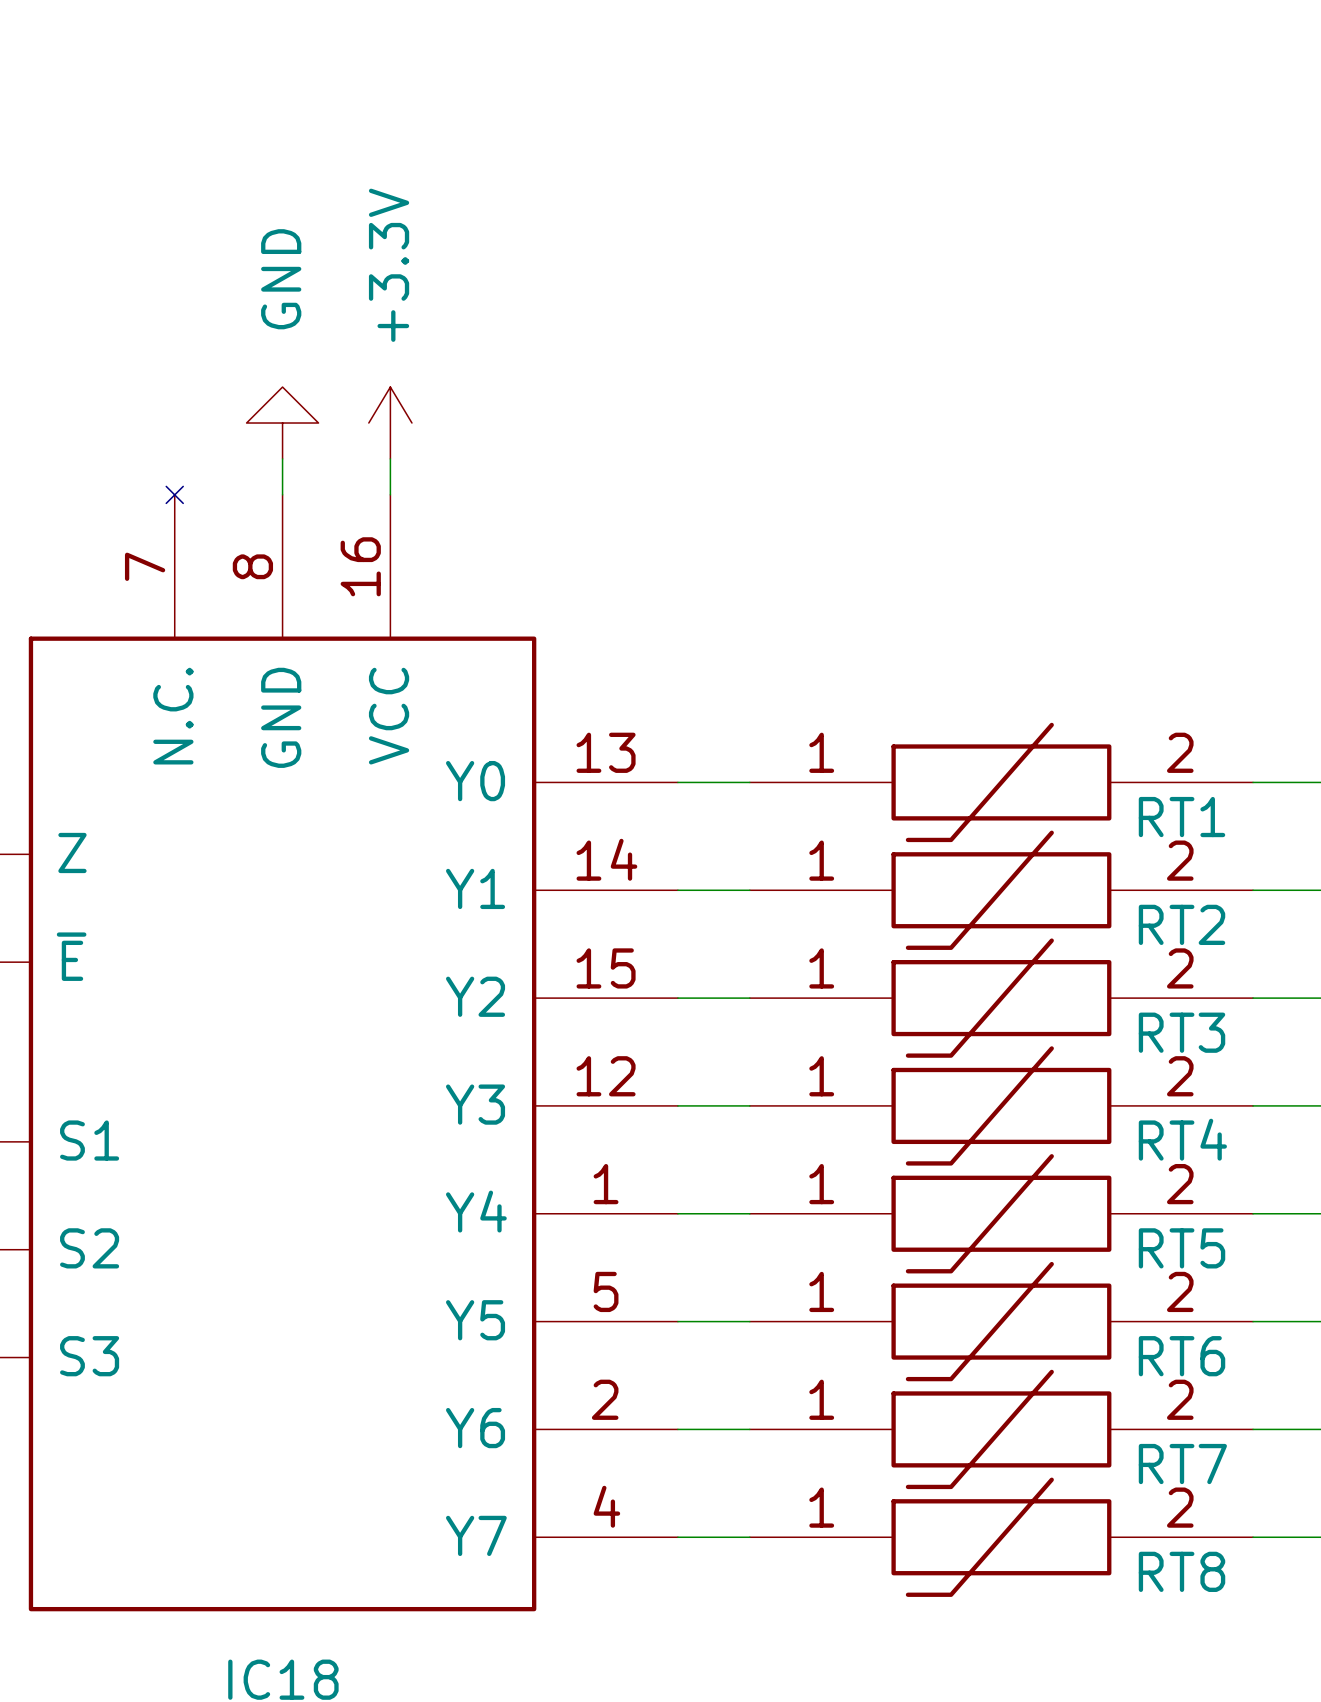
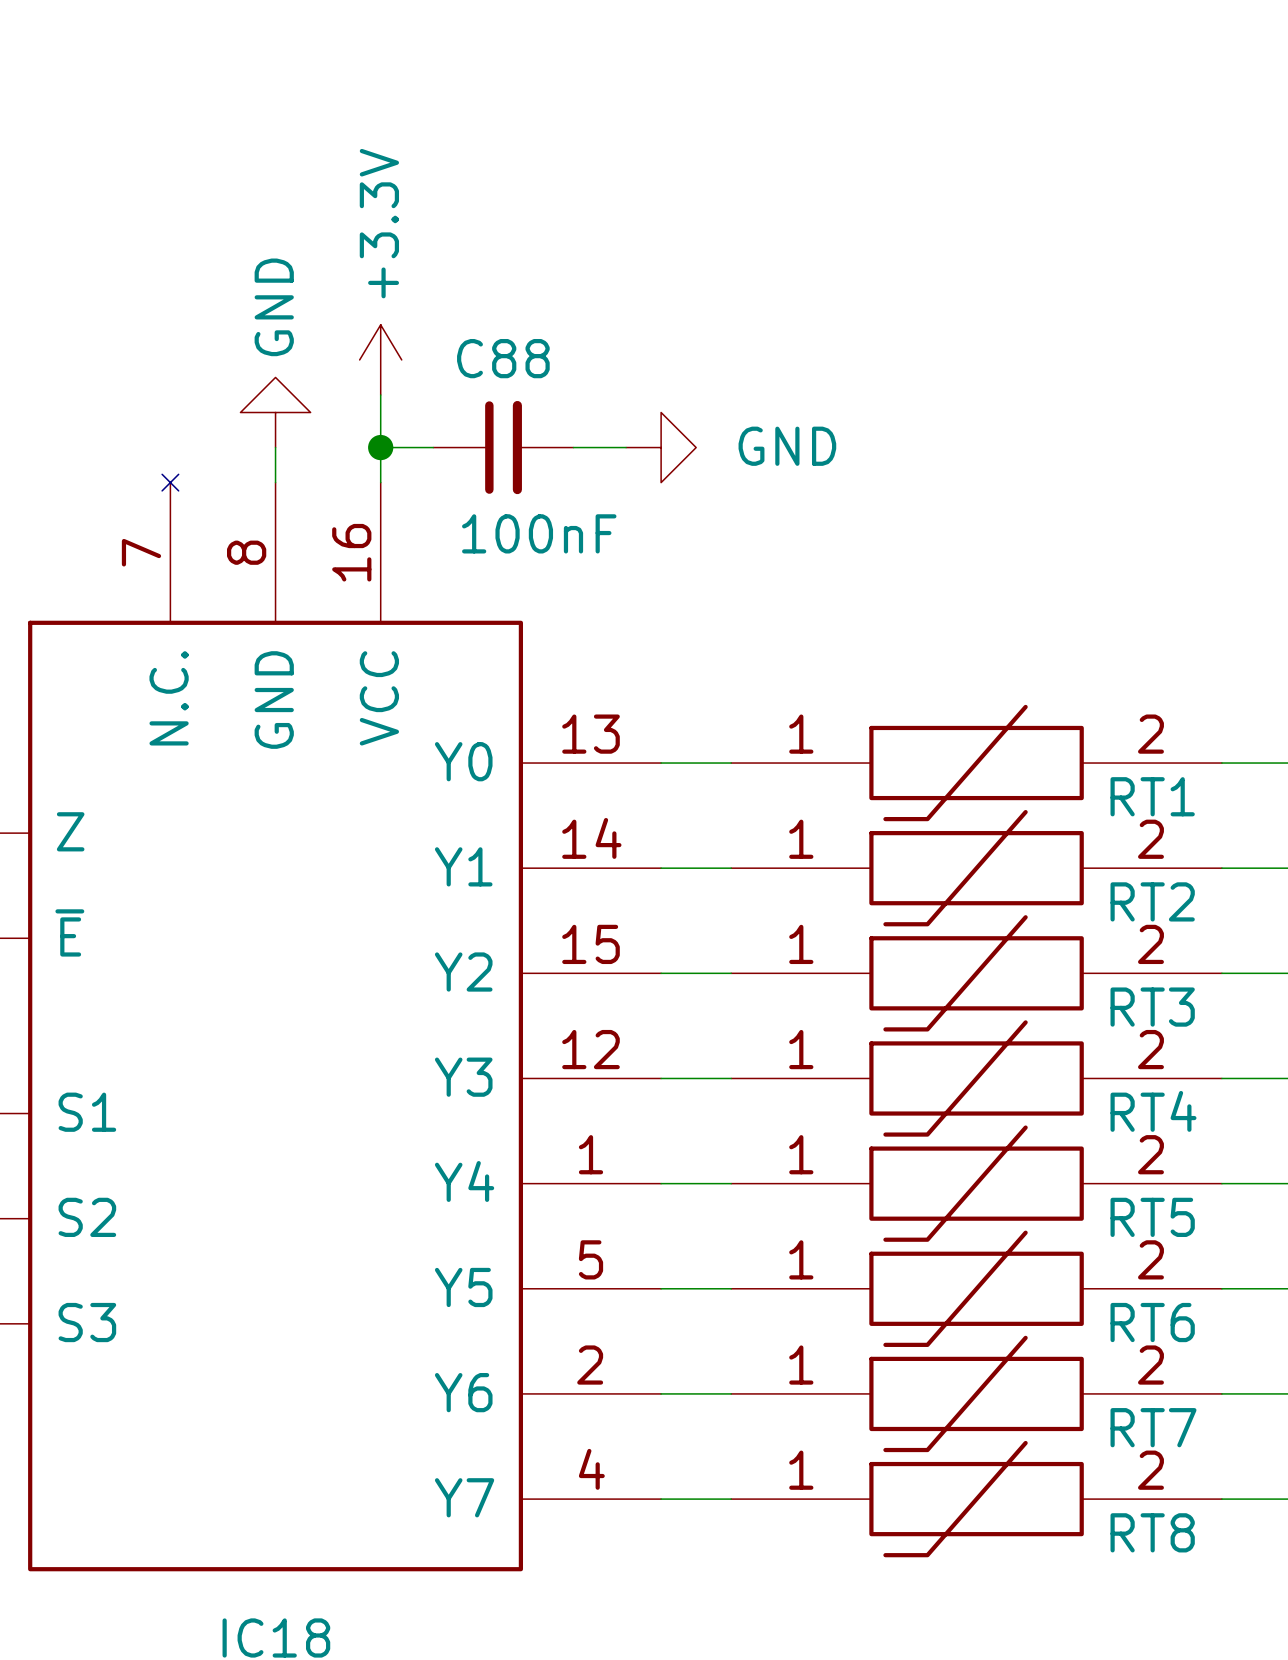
power symbol text position: +3.3V (389, 265) -> +3.3V (379, 223)
power symbol text position: GND (281, 279) -> GND (274, 307)
wire: none -> (380, 394) (380, 447) (433, 447)
power symbol position: +3.3V (390, 423) -> +3.3V (380, 359)
junction: none -> (380, 447)
C88: none -> 100nF (503, 447)
wire: none -> (573, 447) (626, 447)
power symbol: none -> GND (661, 447)

